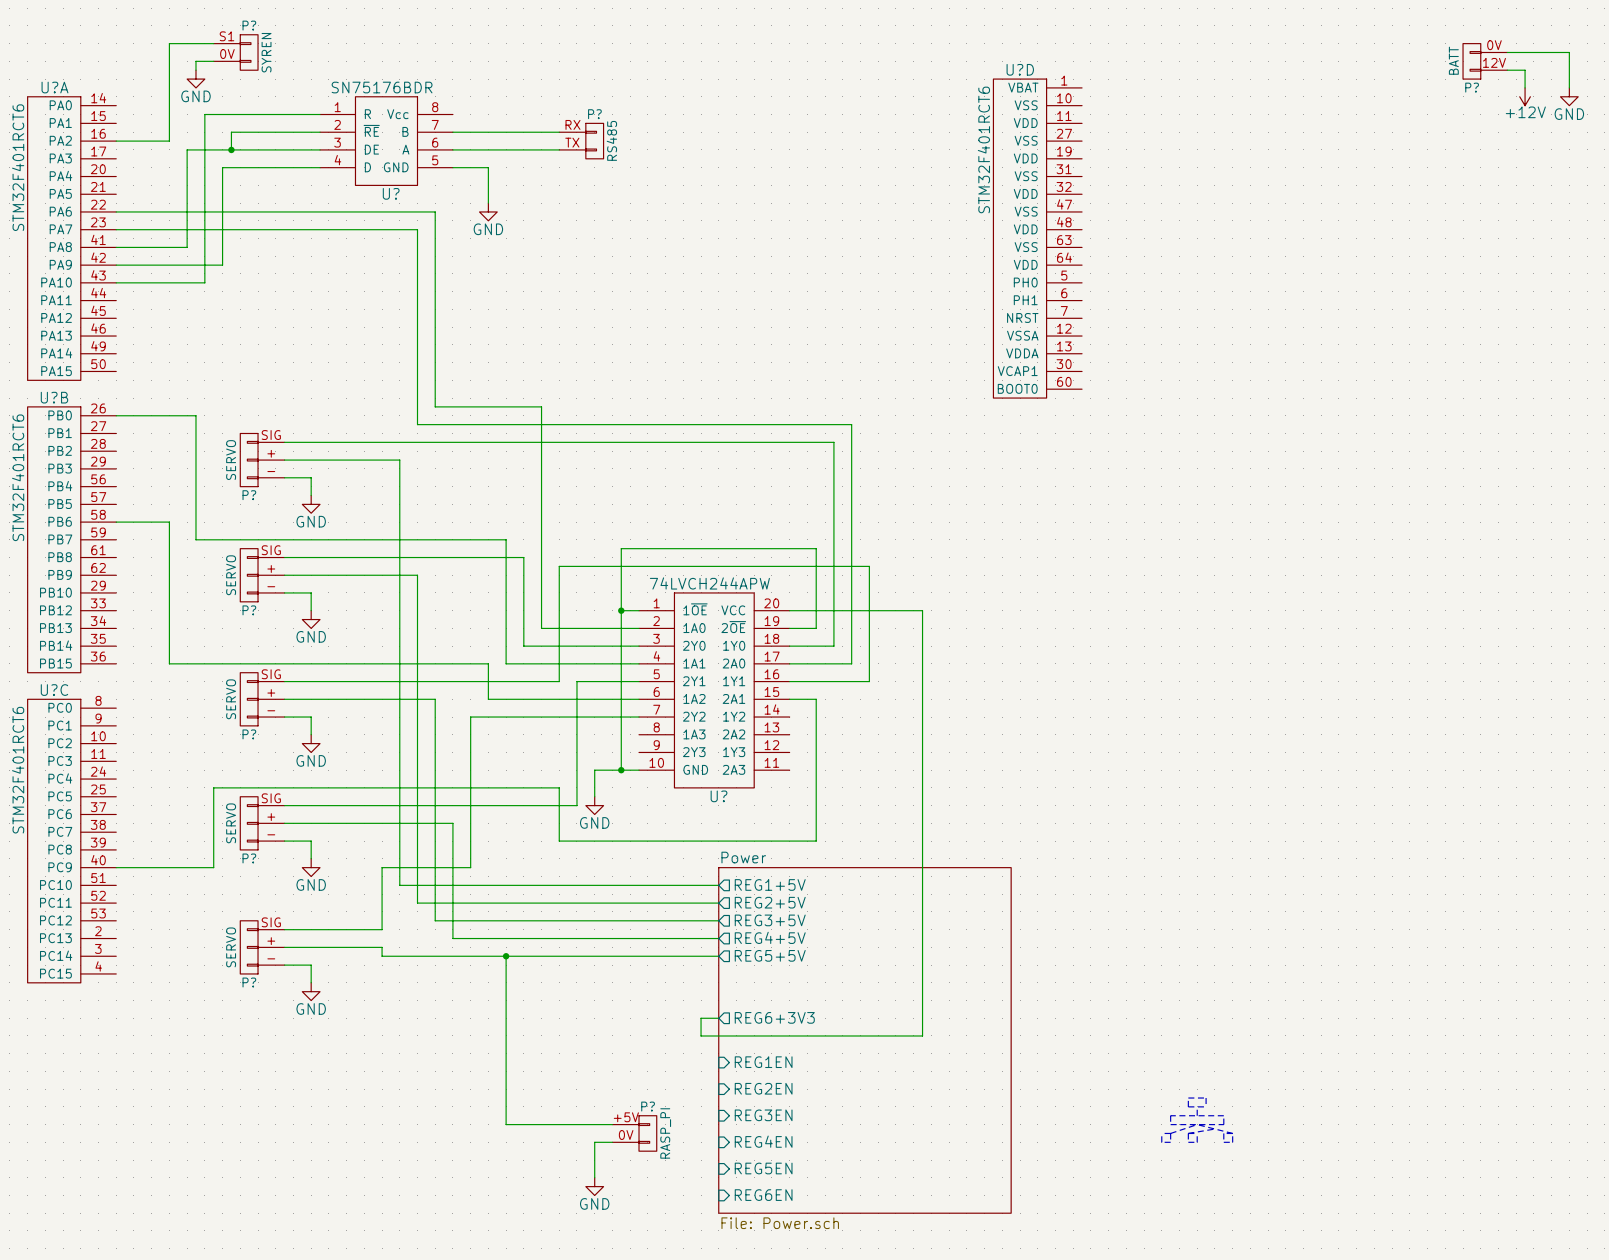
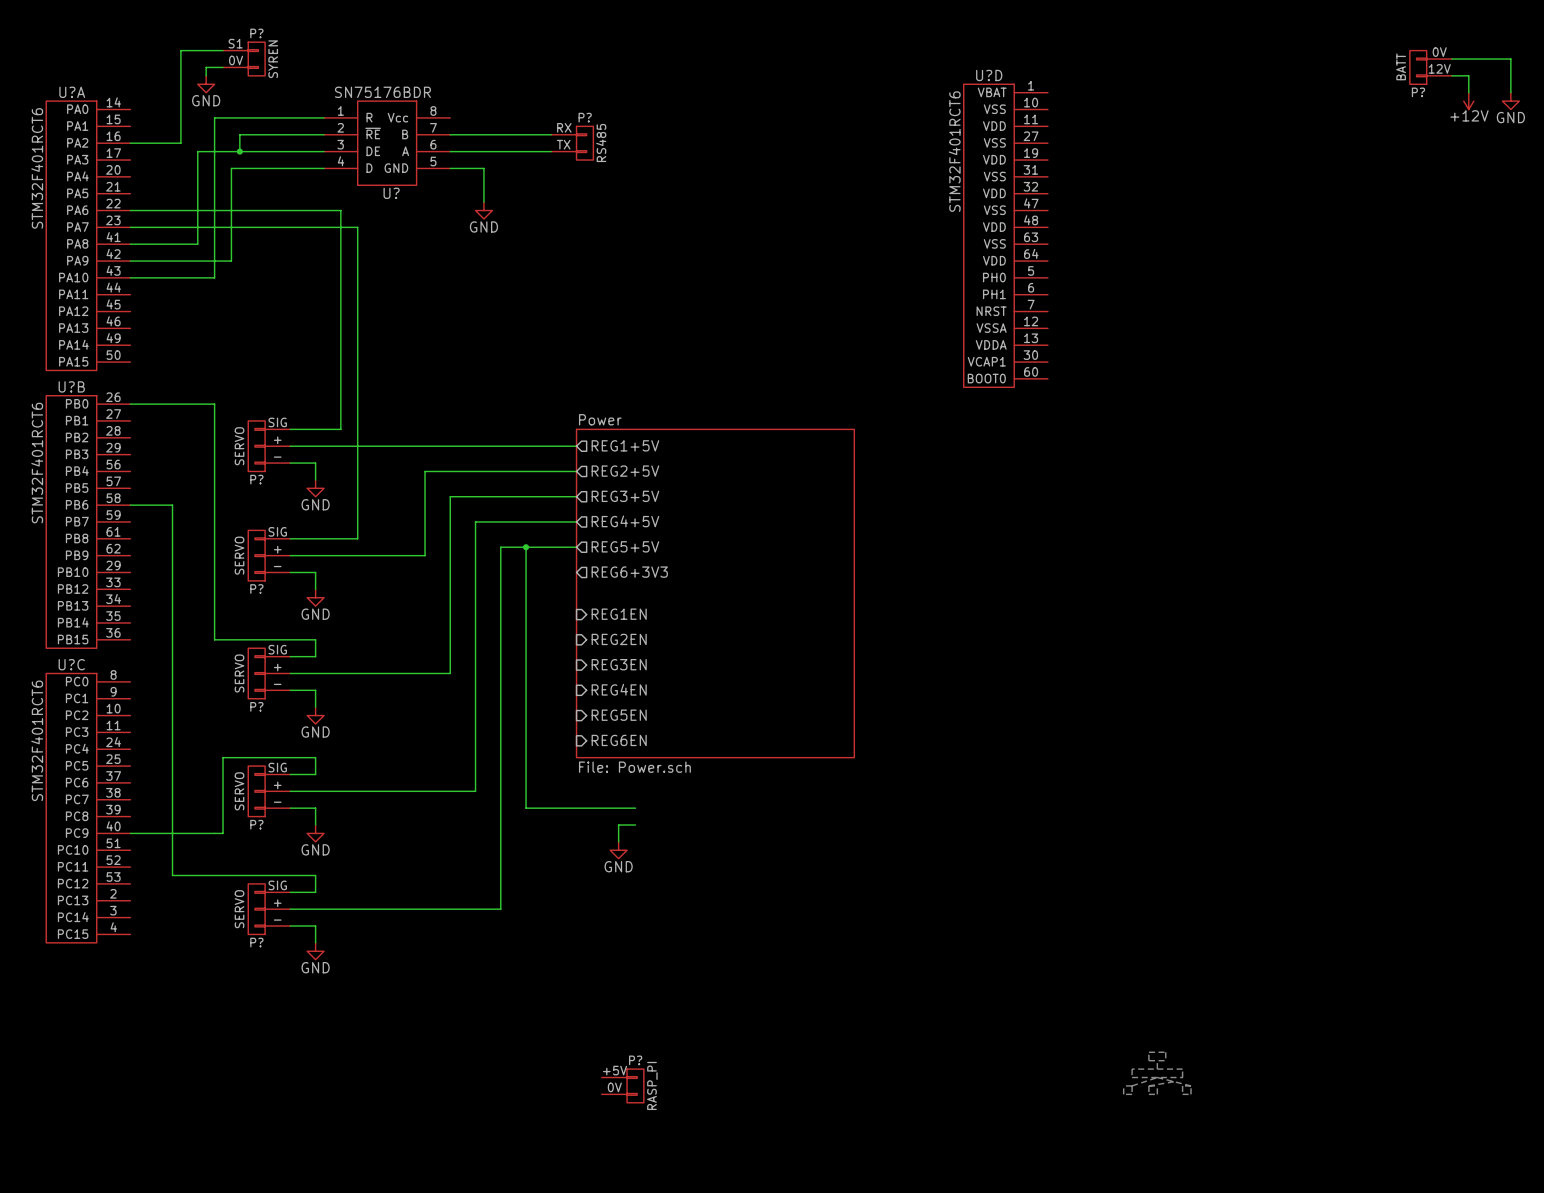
wire: (337, 211) (435, 211) (435, 406) (541, 406) (541, 628) (639, 628) -> (340, 210) (340, 429)
wire: (355, 229) (417, 229) (417, 424) (851, 424) (851, 663) (789, 663) -> (357, 227) (357, 538)
wire: (195, 415) (195, 539) (479, 539) -> none
wire: (337, 442) (833, 442) (833, 646) (789, 646) -> none
sheet pin: none -> REG1+5V (625, 445)
wire: (399, 460) (399, 885) (718, 885) -> (399, 446) (576, 446)
sheet pin: none -> REG2+5V (625, 471)
sheet pin: none -> REG3+5V (625, 496)
wire: (160, 522) (169, 522) (169, 663) (204, 663) -> (206, 404) (214, 404) (214, 639)
wire: (506, 539) (506, 566) -> (551, 547) (500, 547)
wire: none -> (500, 521) (576, 521)
sheet pin: none -> REG4+5V (625, 521)
wire: (355, 557) (523, 557) (523, 646) (639, 646) -> none
sheet pin: none -> REG5+5V (625, 546)
wire: none -> (526, 547) (526, 808) (551, 808)
junction: none -> (526, 547)
wire: (559, 566) (559, 681) (311, 681) -> (315, 639) (315, 656)
wire: (585, 566) (869, 566) (869, 681) (789, 681) -> none
wire: (417, 575) (417, 903) (718, 903) -> (416, 555) (425, 555) (425, 471) (576, 471)
sheet pin: none -> REG6+3V3 (629, 572)
wire: (621, 610) (639, 610) -> none
junction: (621, 610) -> none
wire: (789, 610) (922, 610) (922, 1035) (701, 1035) (701, 1018) (718, 1018) -> none
sheet Power: none -> File: Power.sch (715, 593)
wire: (789, 628) (816, 628) (816, 548) (621, 548) (621, 770) -> none
sheet pin: none -> REG1EN (619, 614)
wire: (311, 663) (488, 663) (488, 699) (639, 699) -> none
wire: (506, 663) (639, 663) -> none
sheet pin: none -> REG2EN (619, 639)
wire: (639, 681) (576, 681) (576, 805) (311, 805) -> none
sheet pin: none -> REG3EN (619, 664)
U?: 74LVCH244APW (714, 690) -> none
wire: (435, 699) (435, 920) (718, 920) -> (433, 673) (450, 673) (450, 496) (576, 496)
wire: (789, 699) (816, 699) (816, 841) (647, 841) -> none
sheet pin: none -> REG4EN (619, 689)
wire: (639, 717) (470, 717) (470, 867) (382, 867) (382, 929) (311, 929) -> (172, 505) (172, 875) (315, 875) (315, 892)
sheet pin: none -> REG5EN (619, 715)
sheet pin: none -> REG6EN (619, 740)
junction: (621, 770) -> none
wire: (639, 770) (594, 770) (594, 796) -> none
wire: (311, 787) (559, 787) (559, 841) -> (315, 757) (315, 774)
power symbol position: GND (594, 805) -> GND (618, 850)
wire: (452, 823) (452, 938) (718, 938) -> (450, 791) (475, 791) (475, 521)
wire: none -> (635, 825) (618, 825) (618, 841)
sheet pin: REG1+5V (770, 884) -> none
sheet pin: REG2+5V (770, 902) -> none
sheet pin: REG3+5V (770, 920) -> none
sheet pin: REG4+5V (770, 937) -> none
wire: (382, 947) (382, 956) (718, 956) -> (382, 909) (500, 909) (500, 639)
sheet pin: REG5+5V (770, 955) -> none
wire: (506, 956) (506, 1124) (612, 1124) -> none
junction: (506, 956) -> none
sheet pin: REG6+3V3 (774, 1017) -> none
sheet Power: File: Power.sch (864, 1040) -> none
sheet pin: REG1EN (763, 1062) -> none
sheet pin: REG2EN (763, 1088) -> none
sheet pin: REG3EN (763, 1115) -> none
sheet pin: REG4EN (763, 1141) -> none
wire: (612, 1142) (594, 1142) (594, 1177) -> none
sheet pin: REG5EN (763, 1168) -> none
power symbol: GND (594, 1186) -> none
sheet pin: REG6EN (763, 1195) -> none

